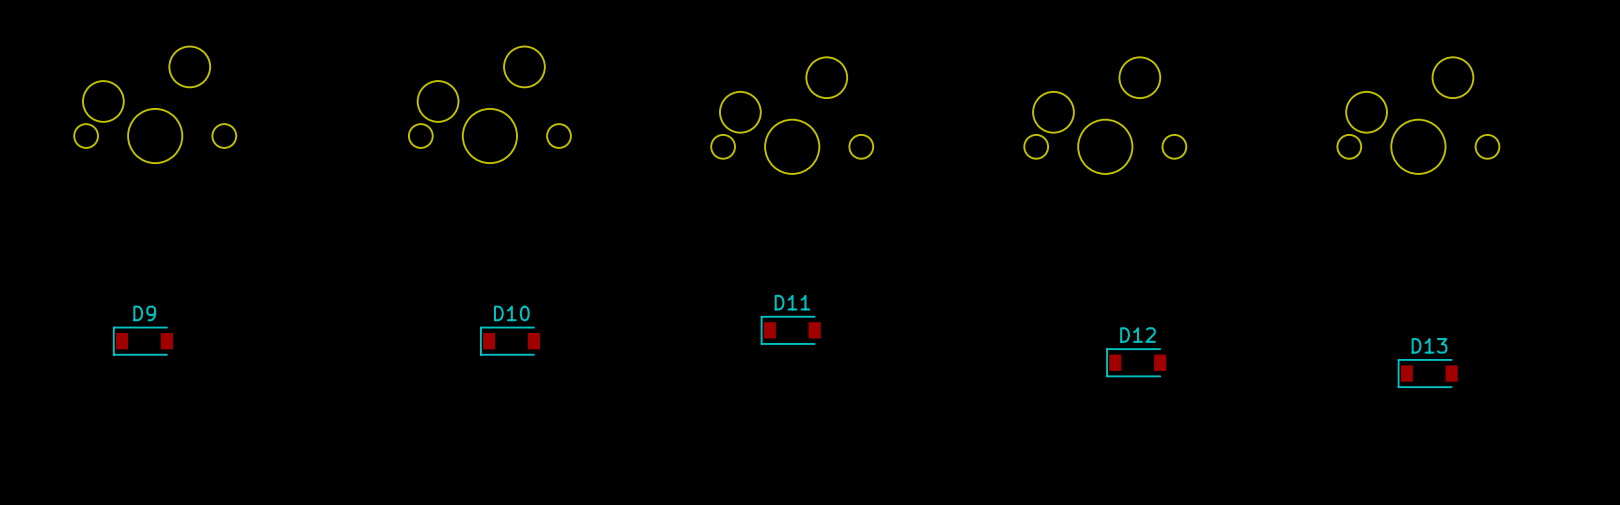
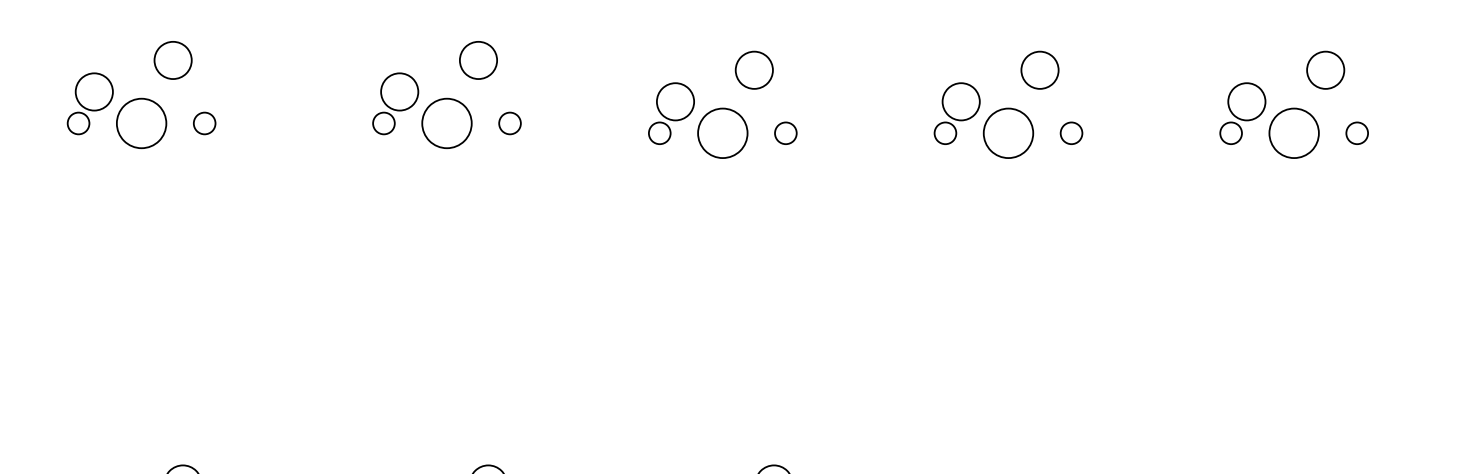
D11: (790, 330) -> none
D9: (142, 341) -> none
D10: (510, 341) -> none
D12: (1136, 362) -> none
D13: (1427, 373) -> none

